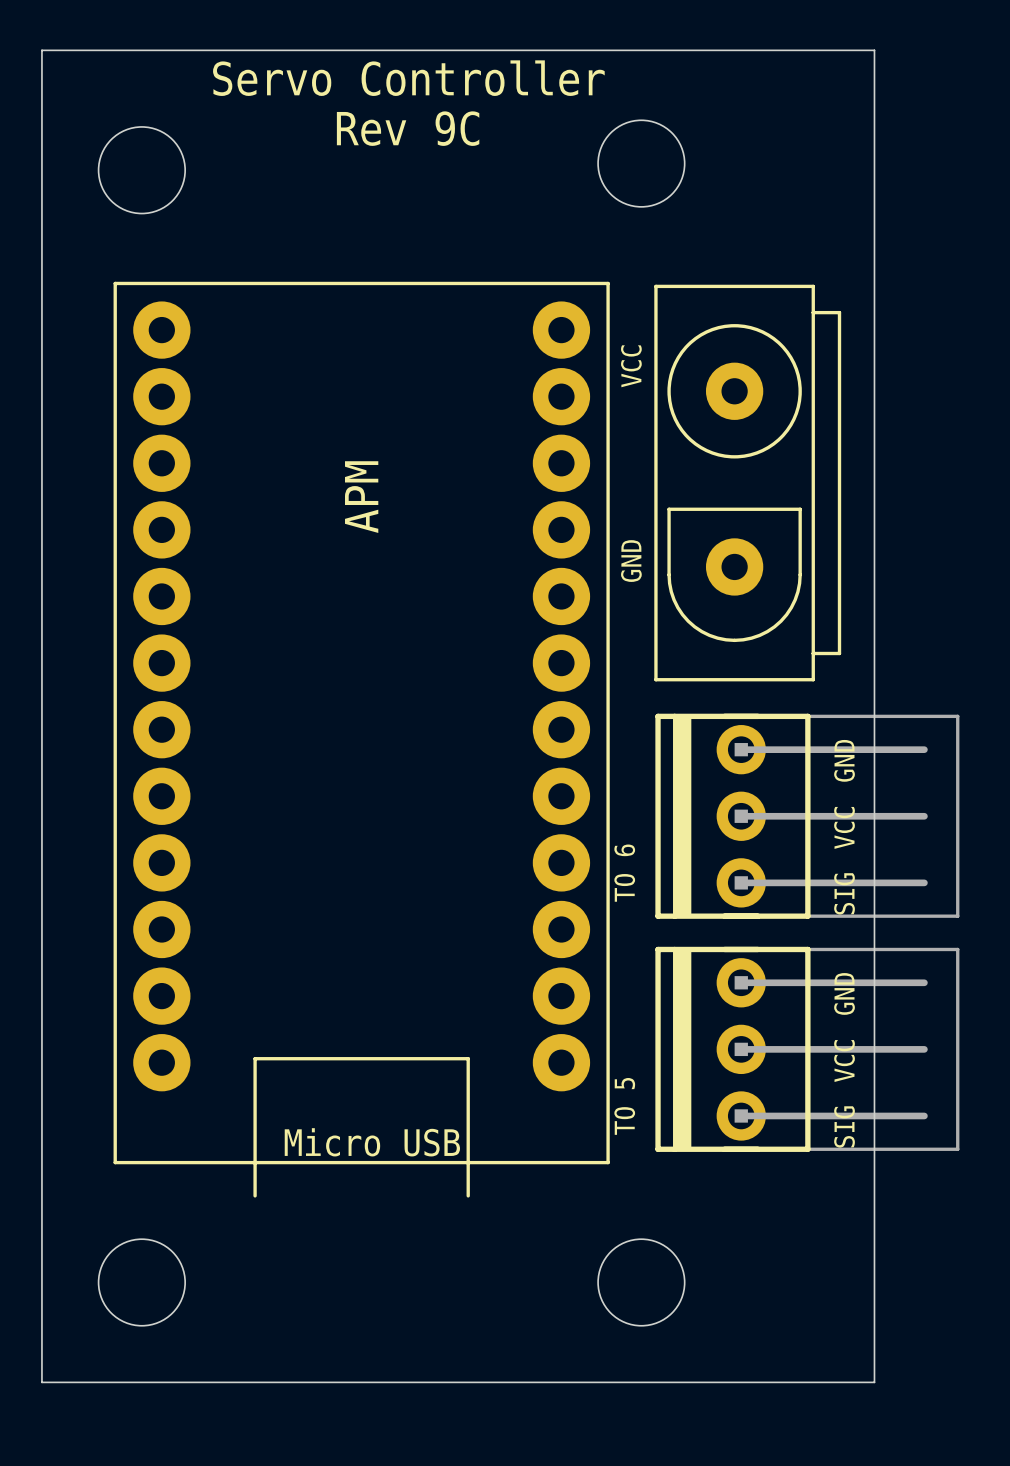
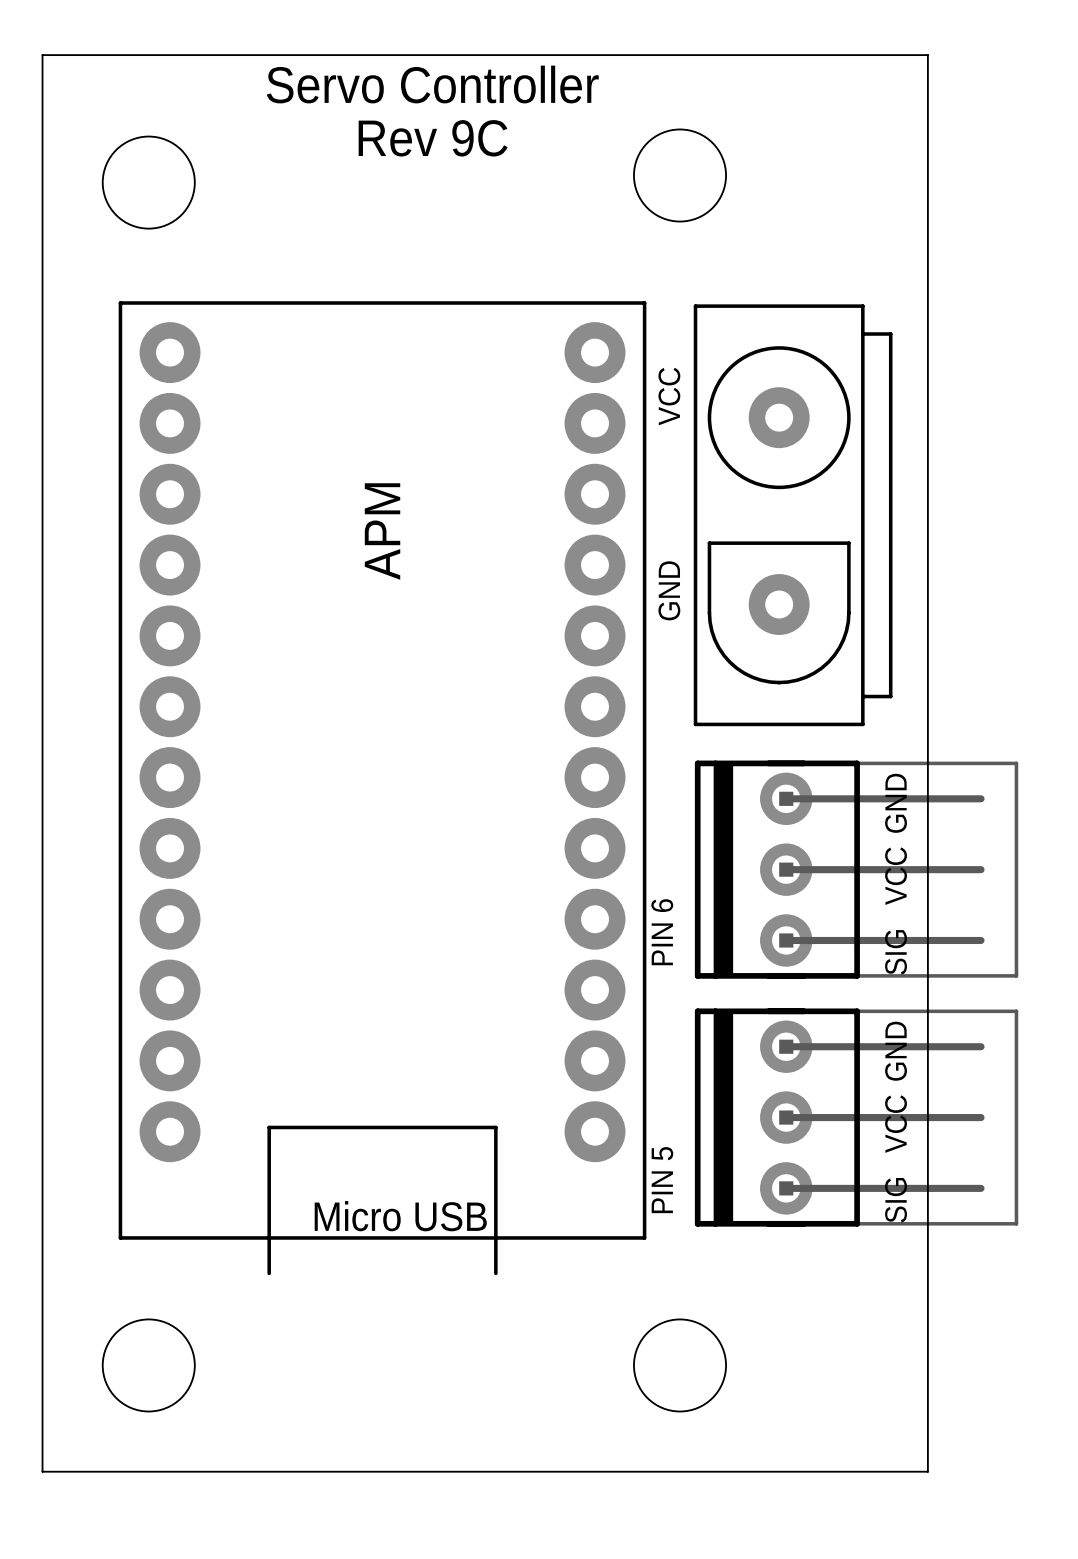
text: TO 6 (624, 873) -> PIN 6 (662, 932)
text: TO 5 (624, 1106) -> PIN 5 (662, 1180)

